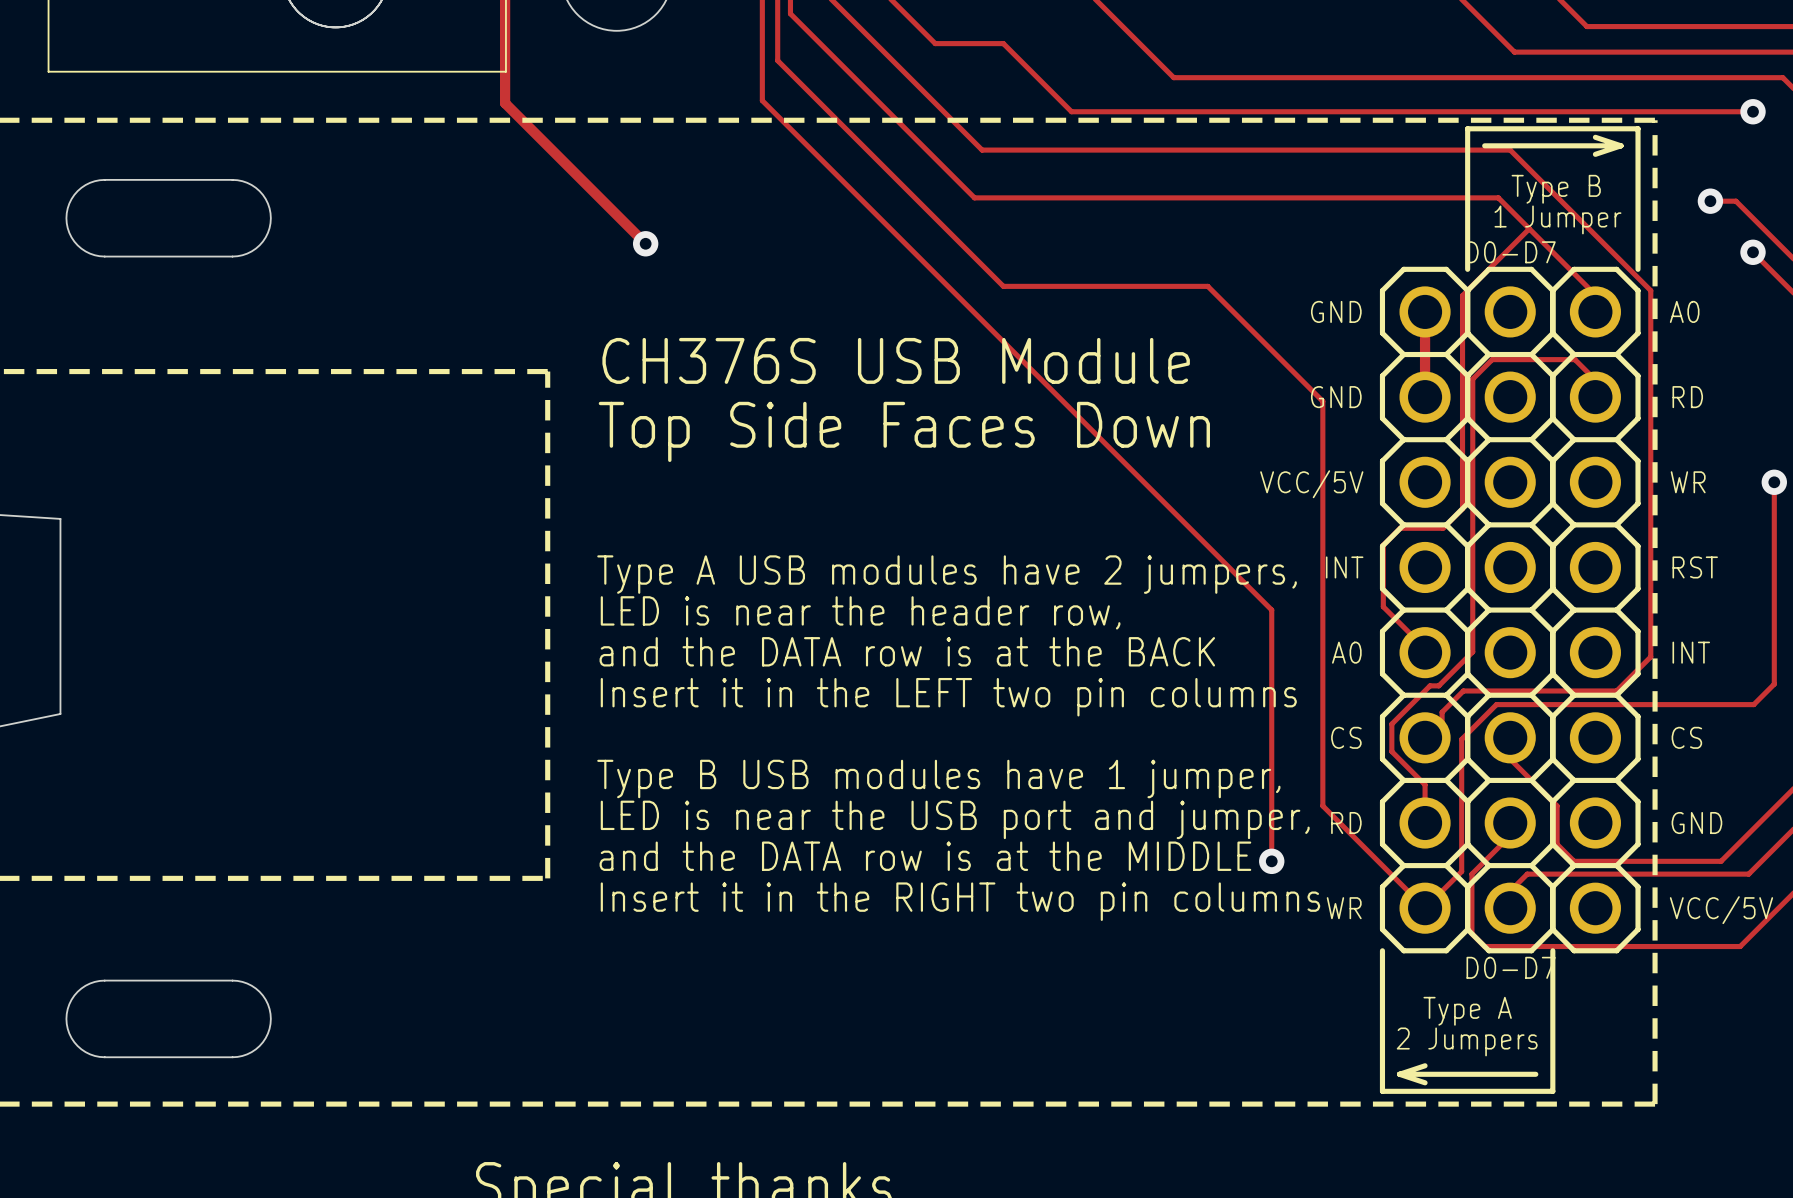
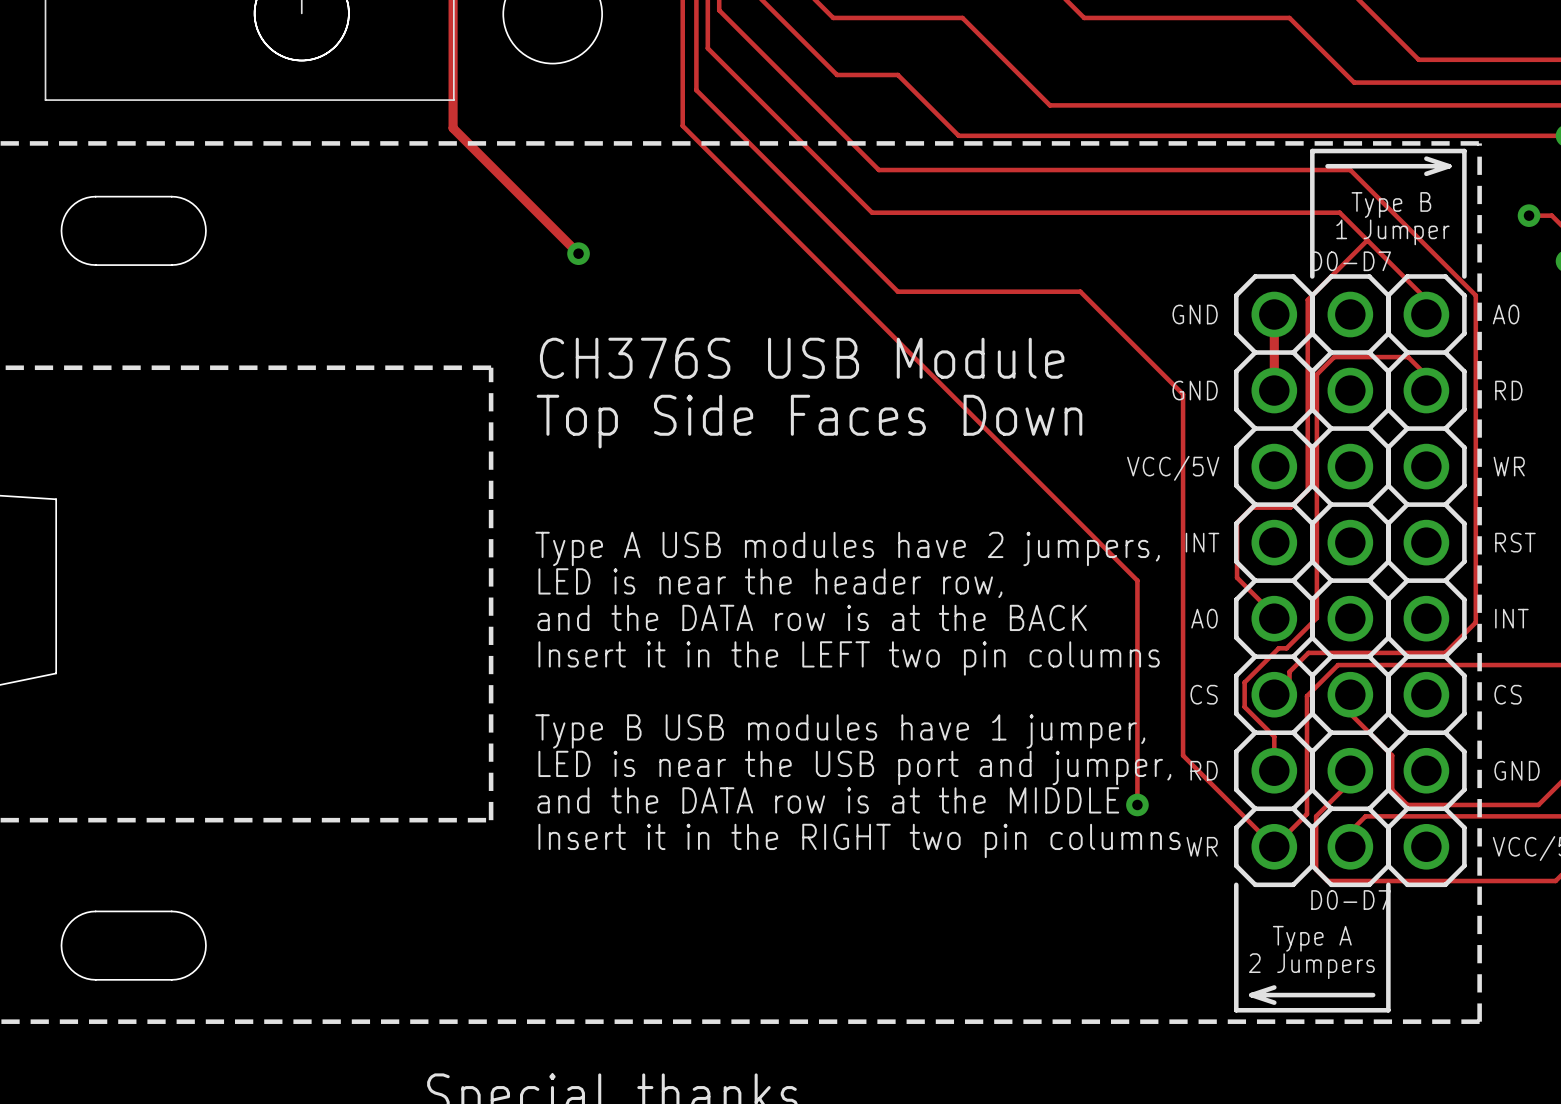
board edge: (189, 179) (232, 179) (247, 182) (255, 187) (265, 199) (270, 218) (265, 237) (255, 248) (247, 253) (232, 256) (189, 256) -> (171, 196) (184, 199) (195, 206) (203, 217) (205, 230) (203, 243) (195, 255) (184, 262) (171, 265)
board edge: (189, 980) (232, 980) (247, 983) (255, 988) (265, 999) (270, 1018) (265, 1038) (255, 1049) (247, 1054) (232, 1057) (189, 1057) -> (171, 911) (184, 914) (195, 921) (203, 932) (205, 945) (203, 958) (195, 969) (184, 977) (171, 979)

